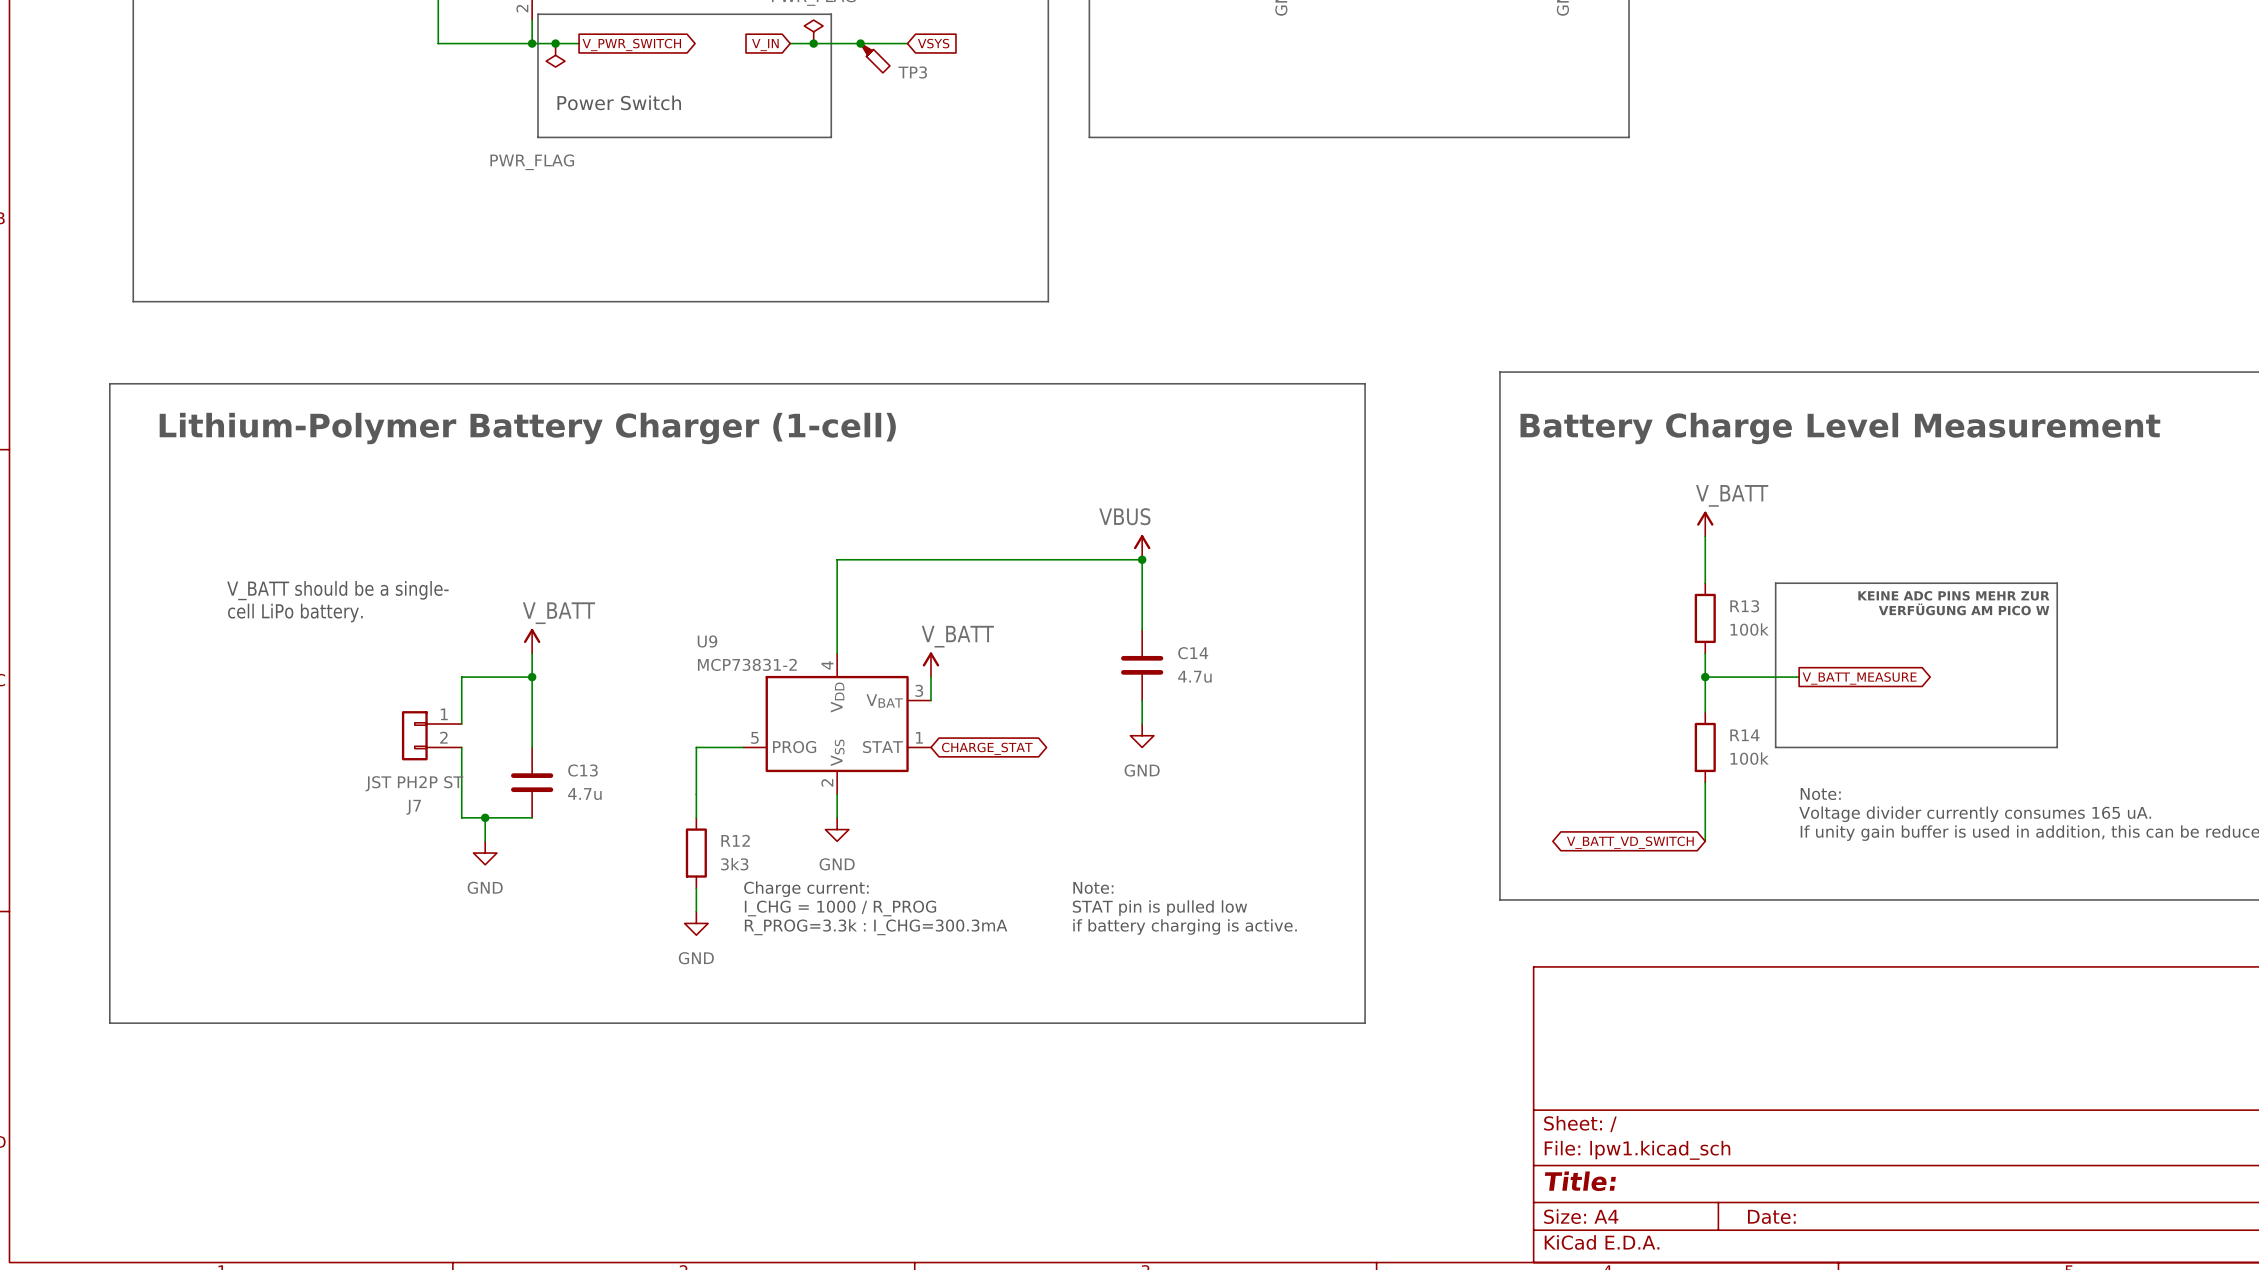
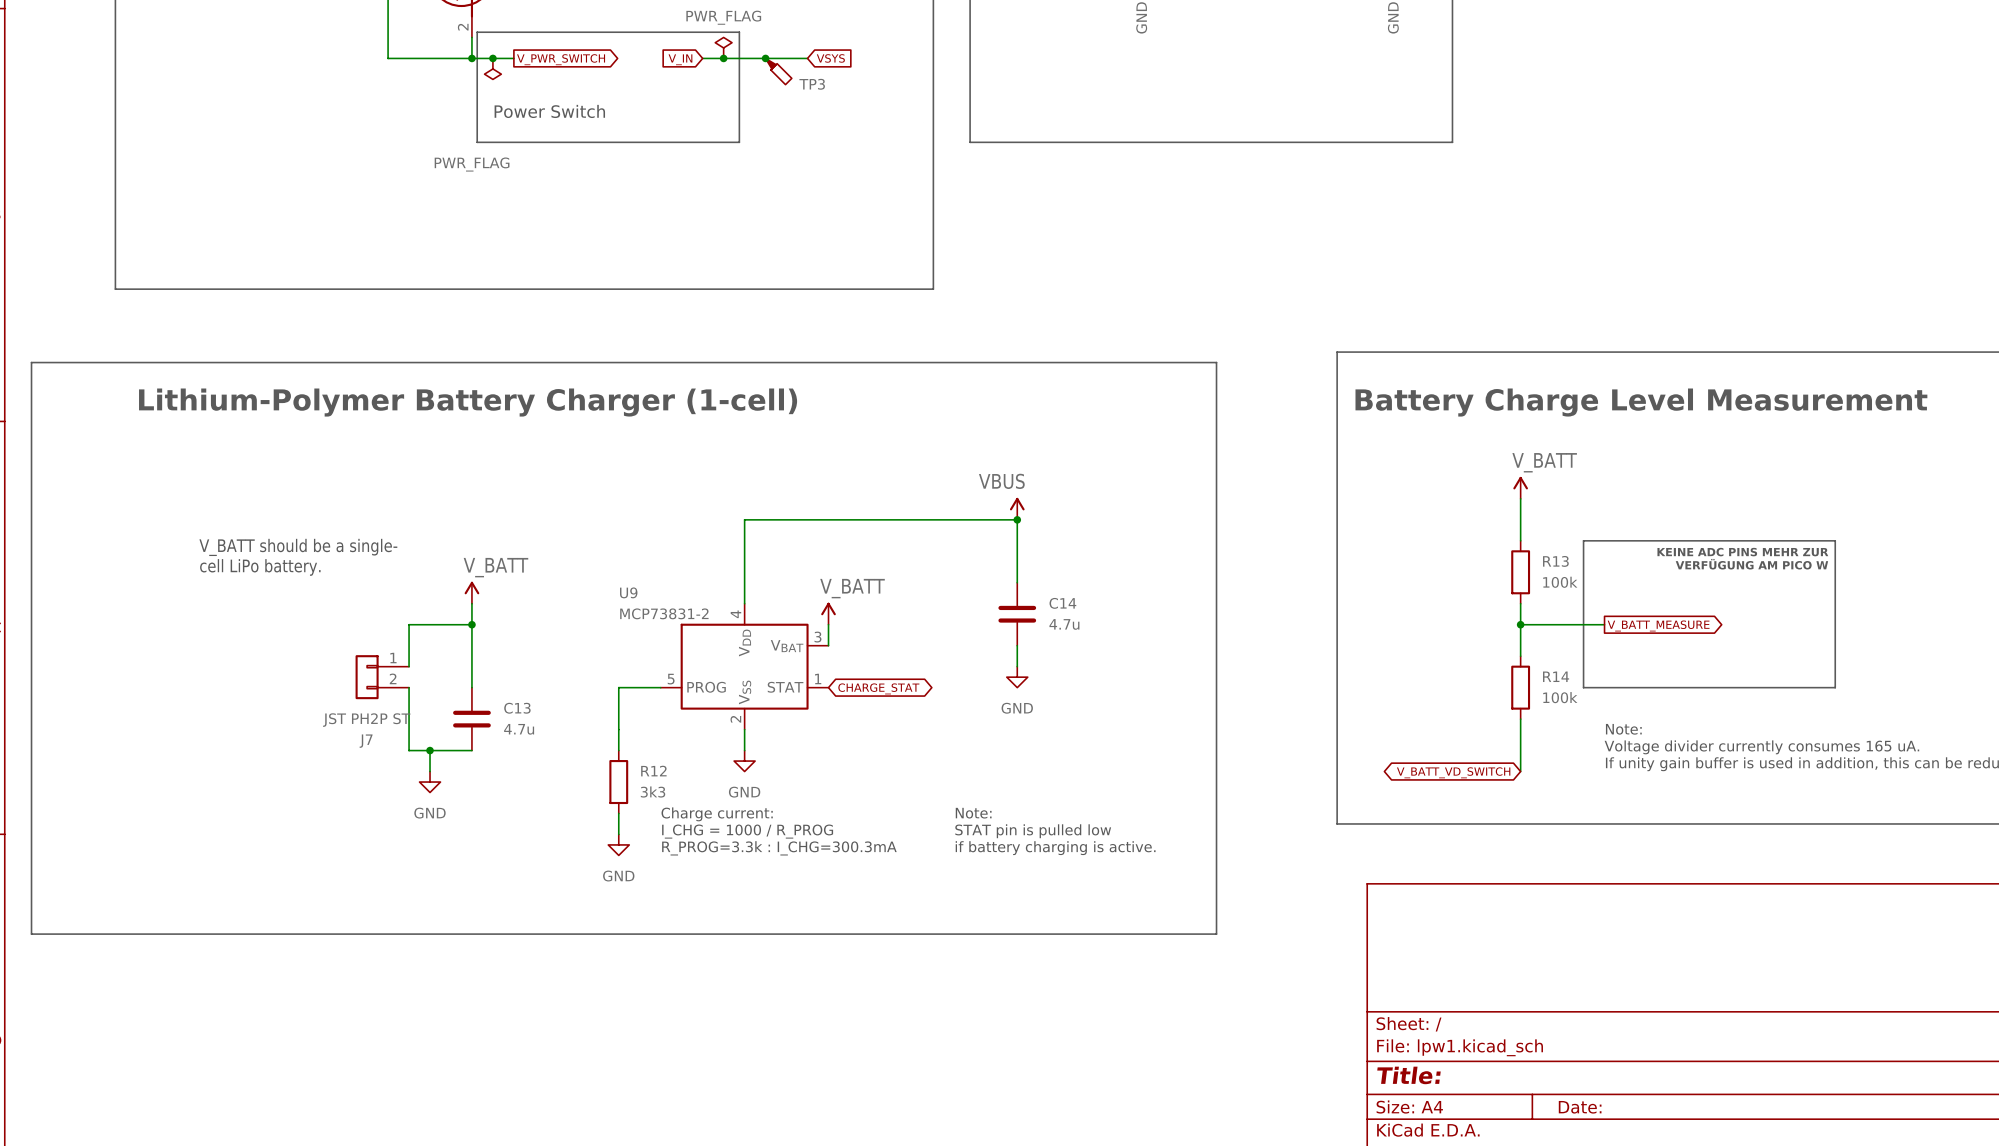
line: (109, 383) (109, 1023) -> (94, 362) (31, 362) (31, 934) (94, 934)

